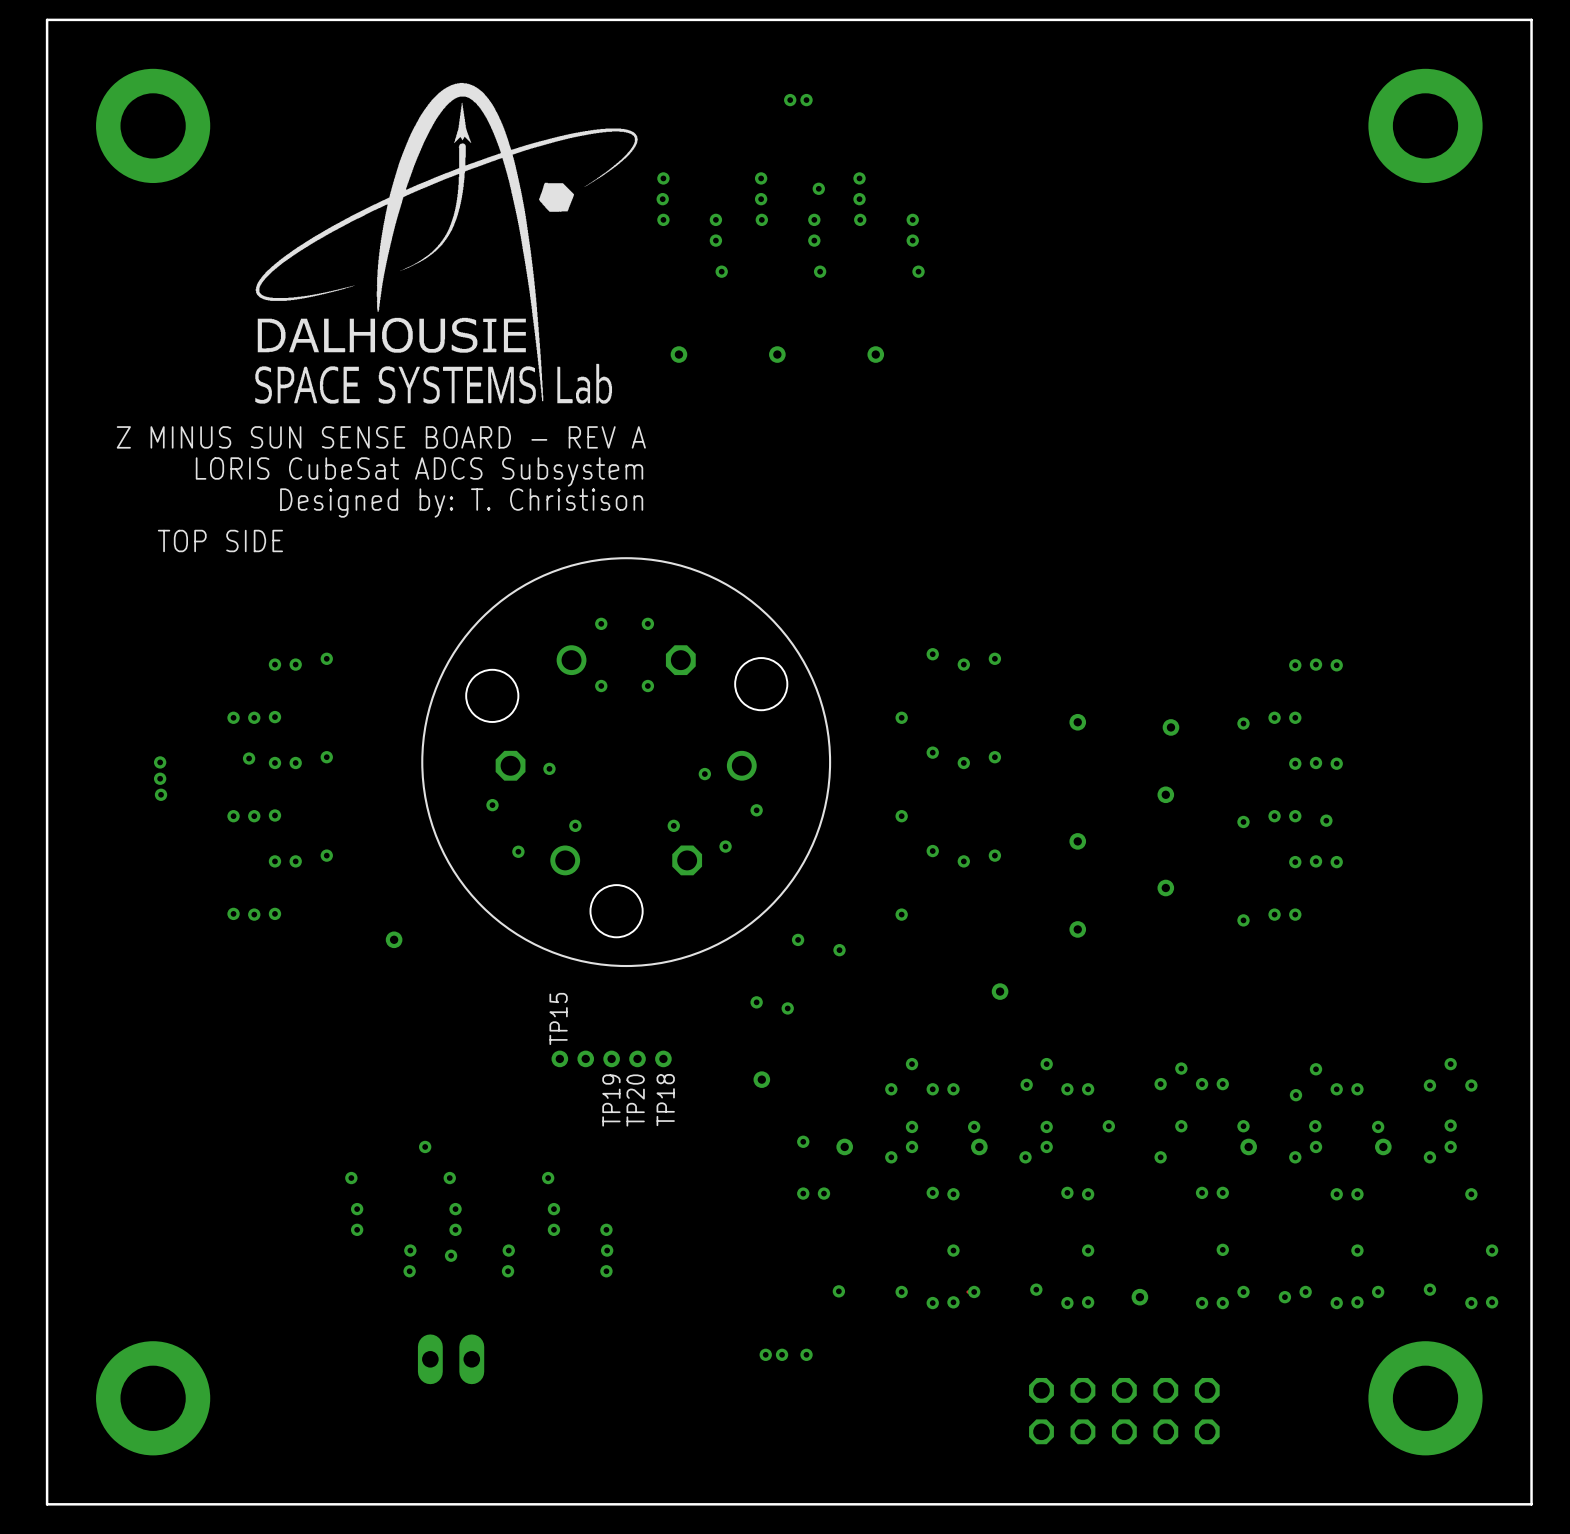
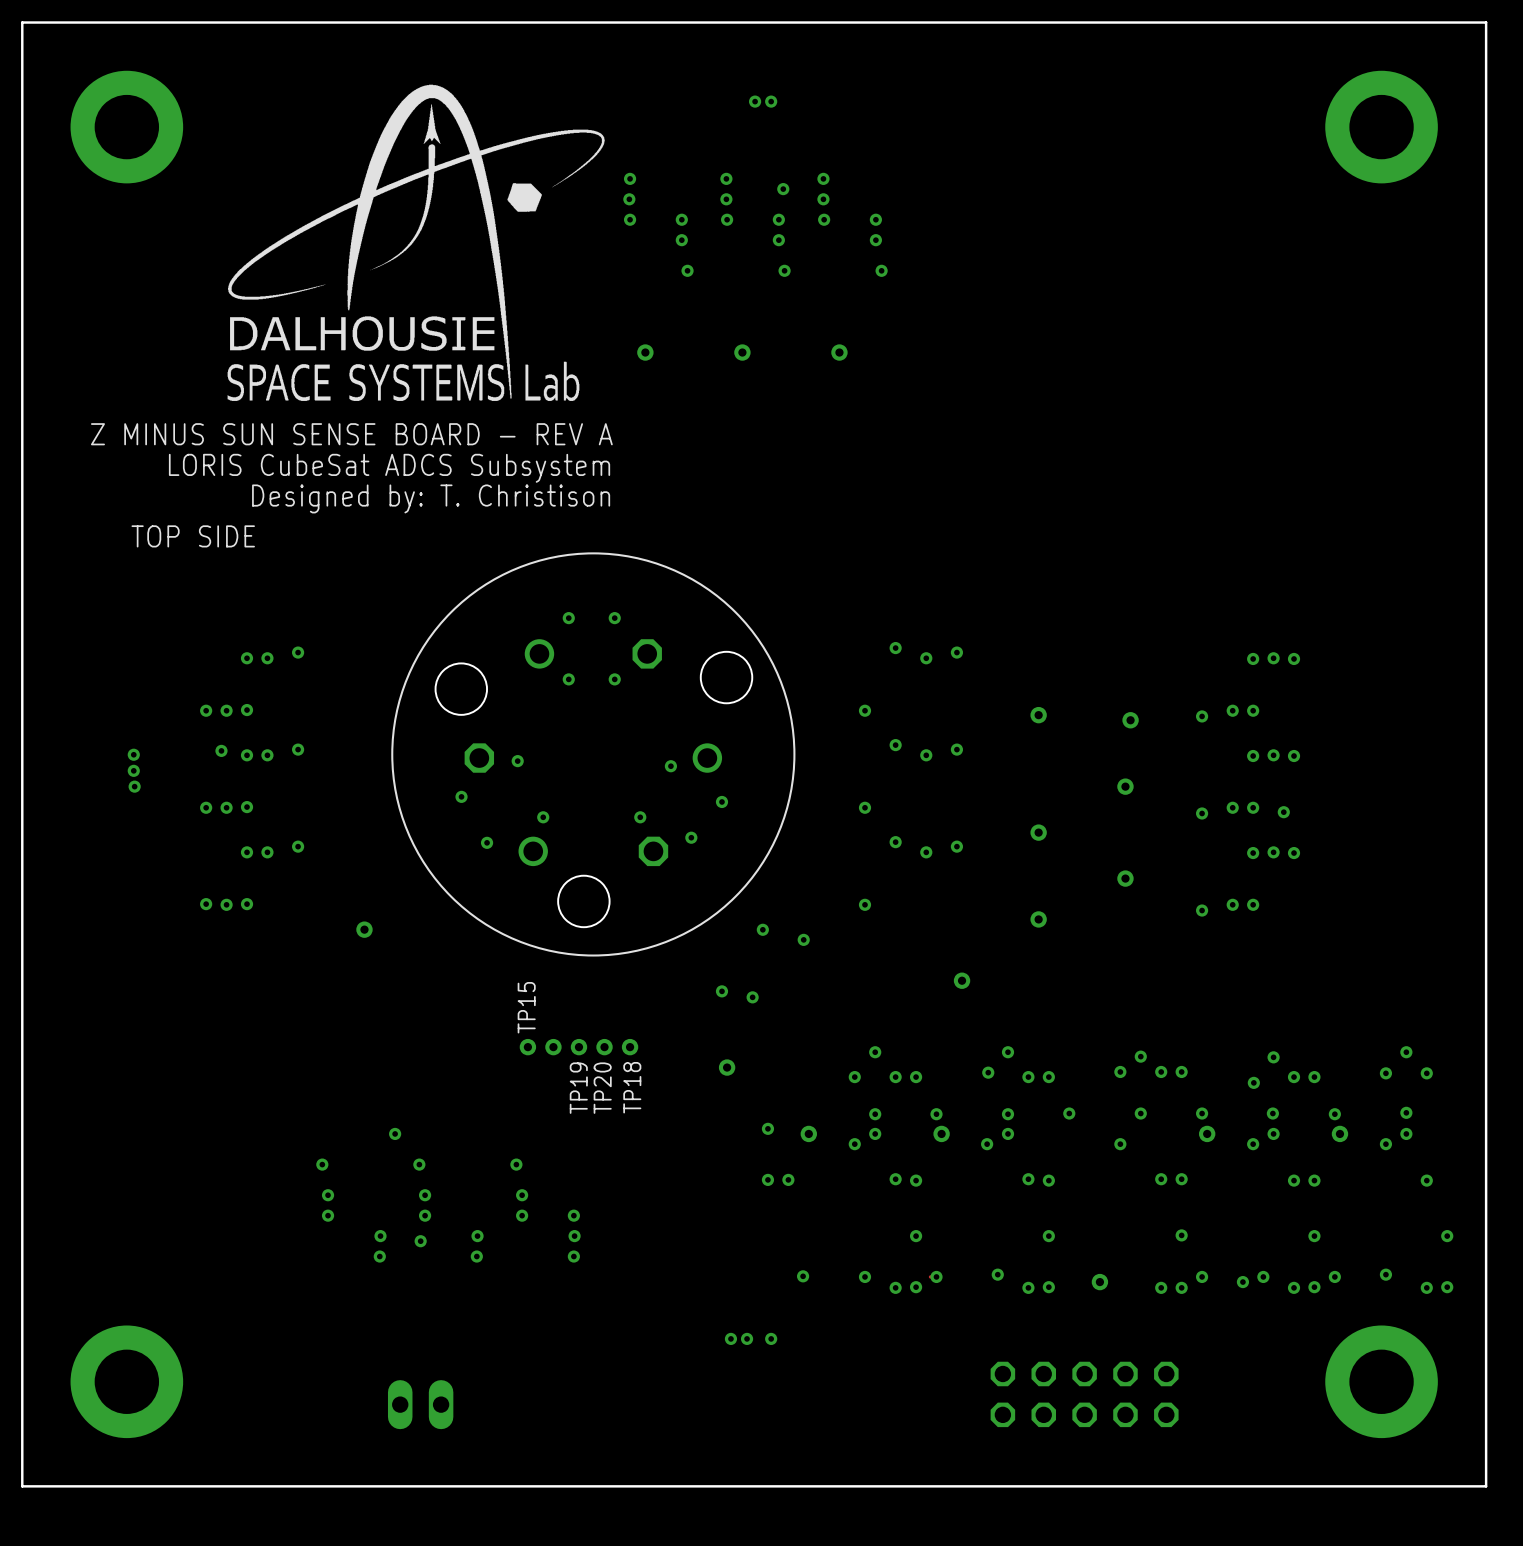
part position: (451, 1359) -> (420, 1404)

